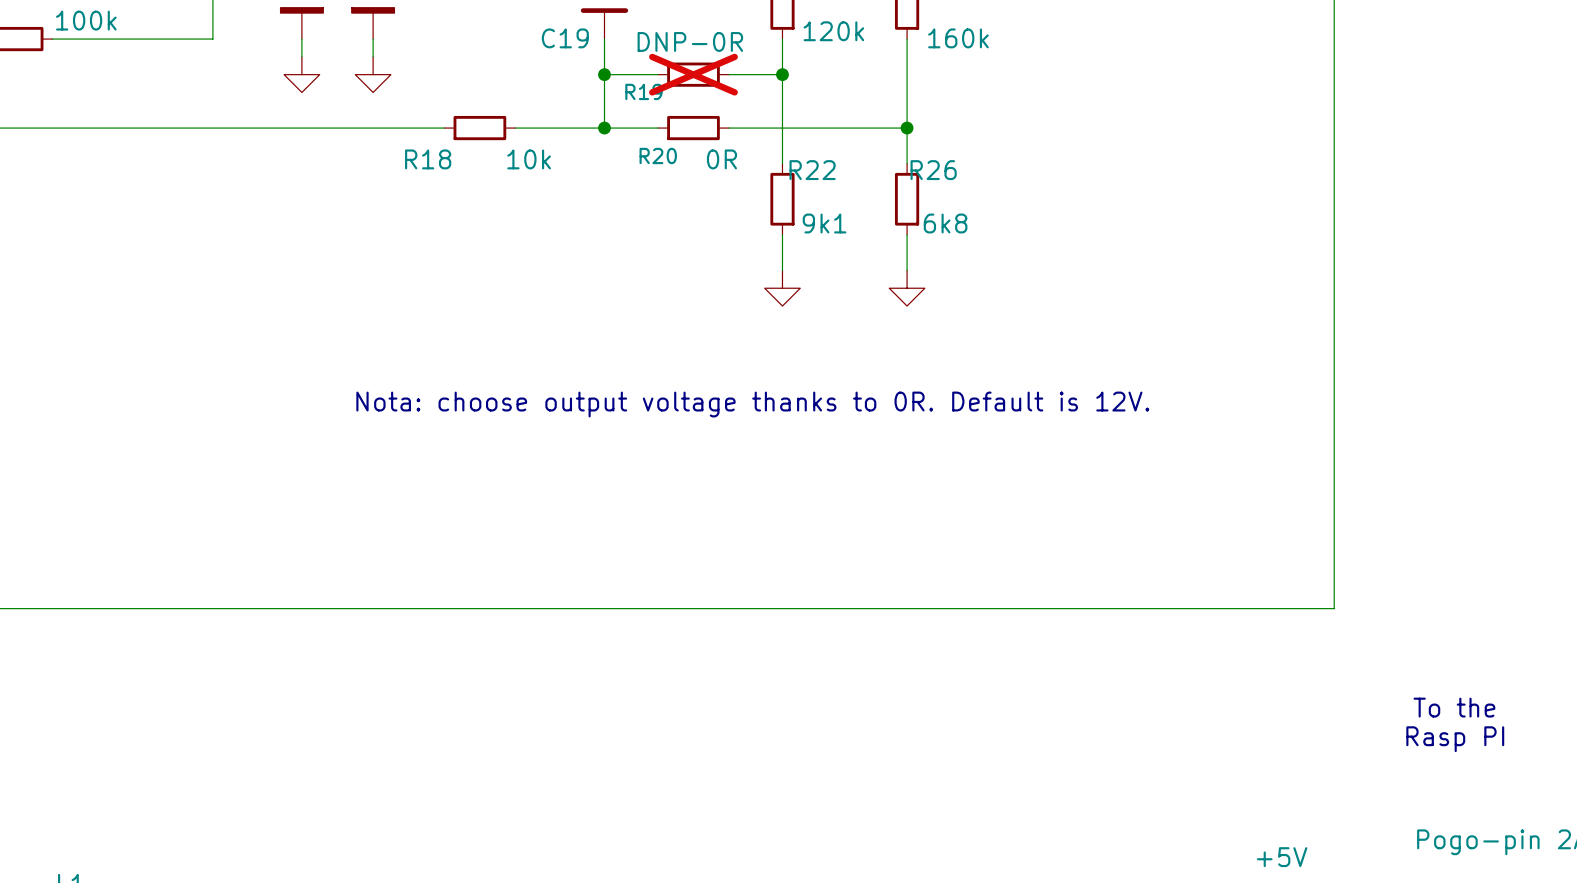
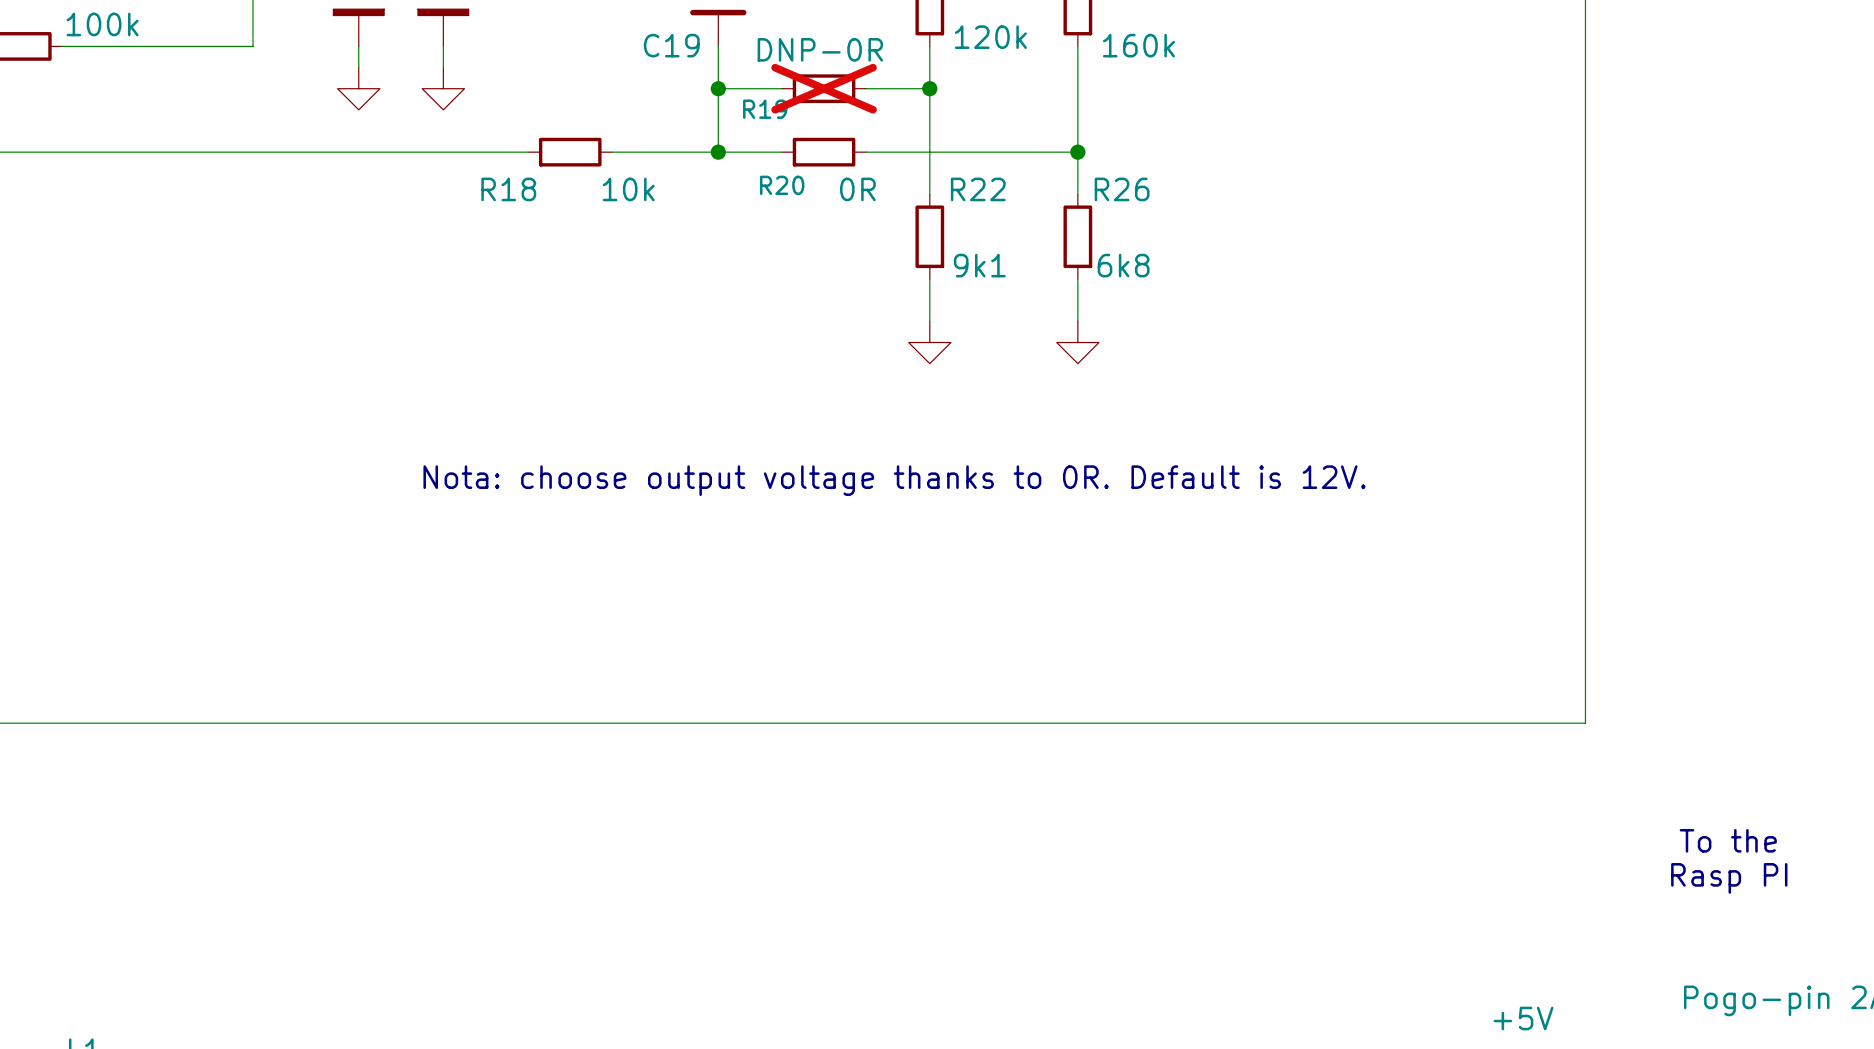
R22 name position: R22 (812, 170) -> R22 (978, 189)
R26 name position: R26 (933, 170) -> R26 (1122, 189)

